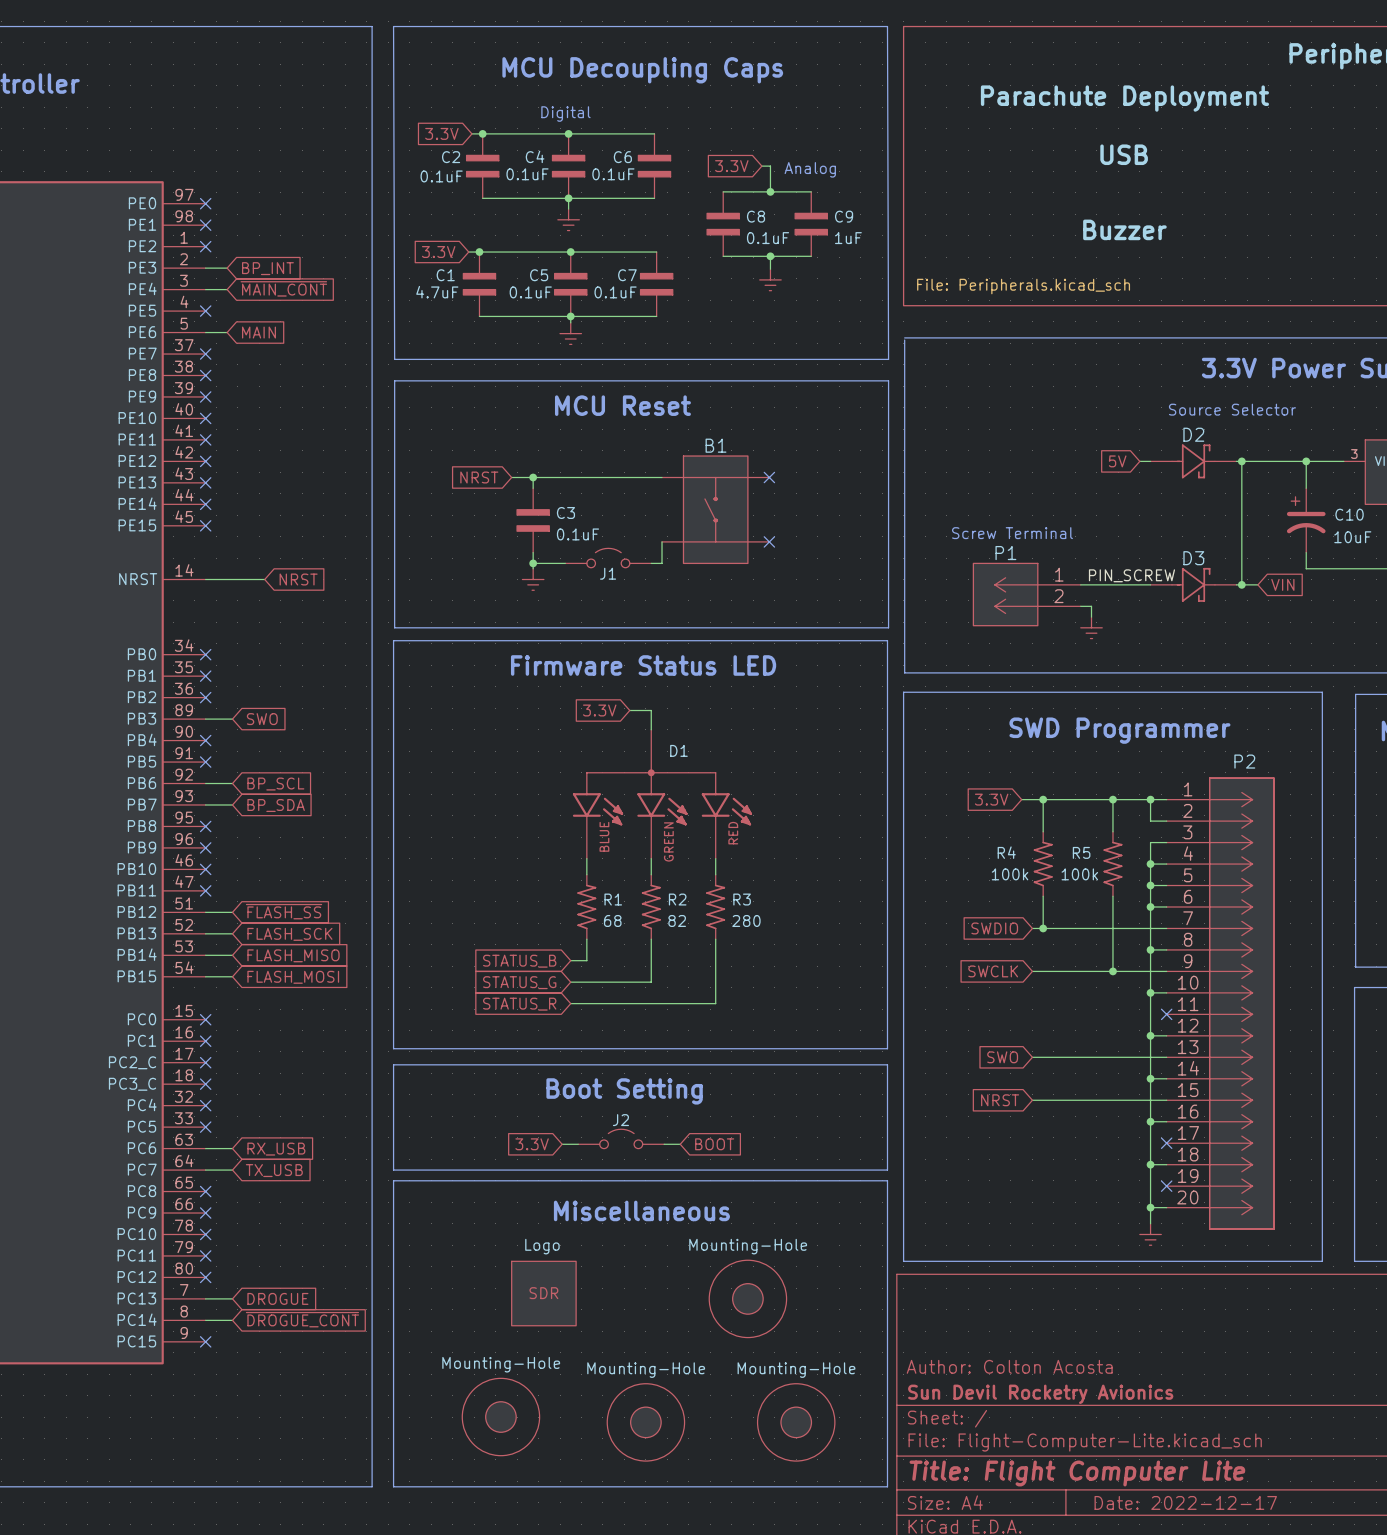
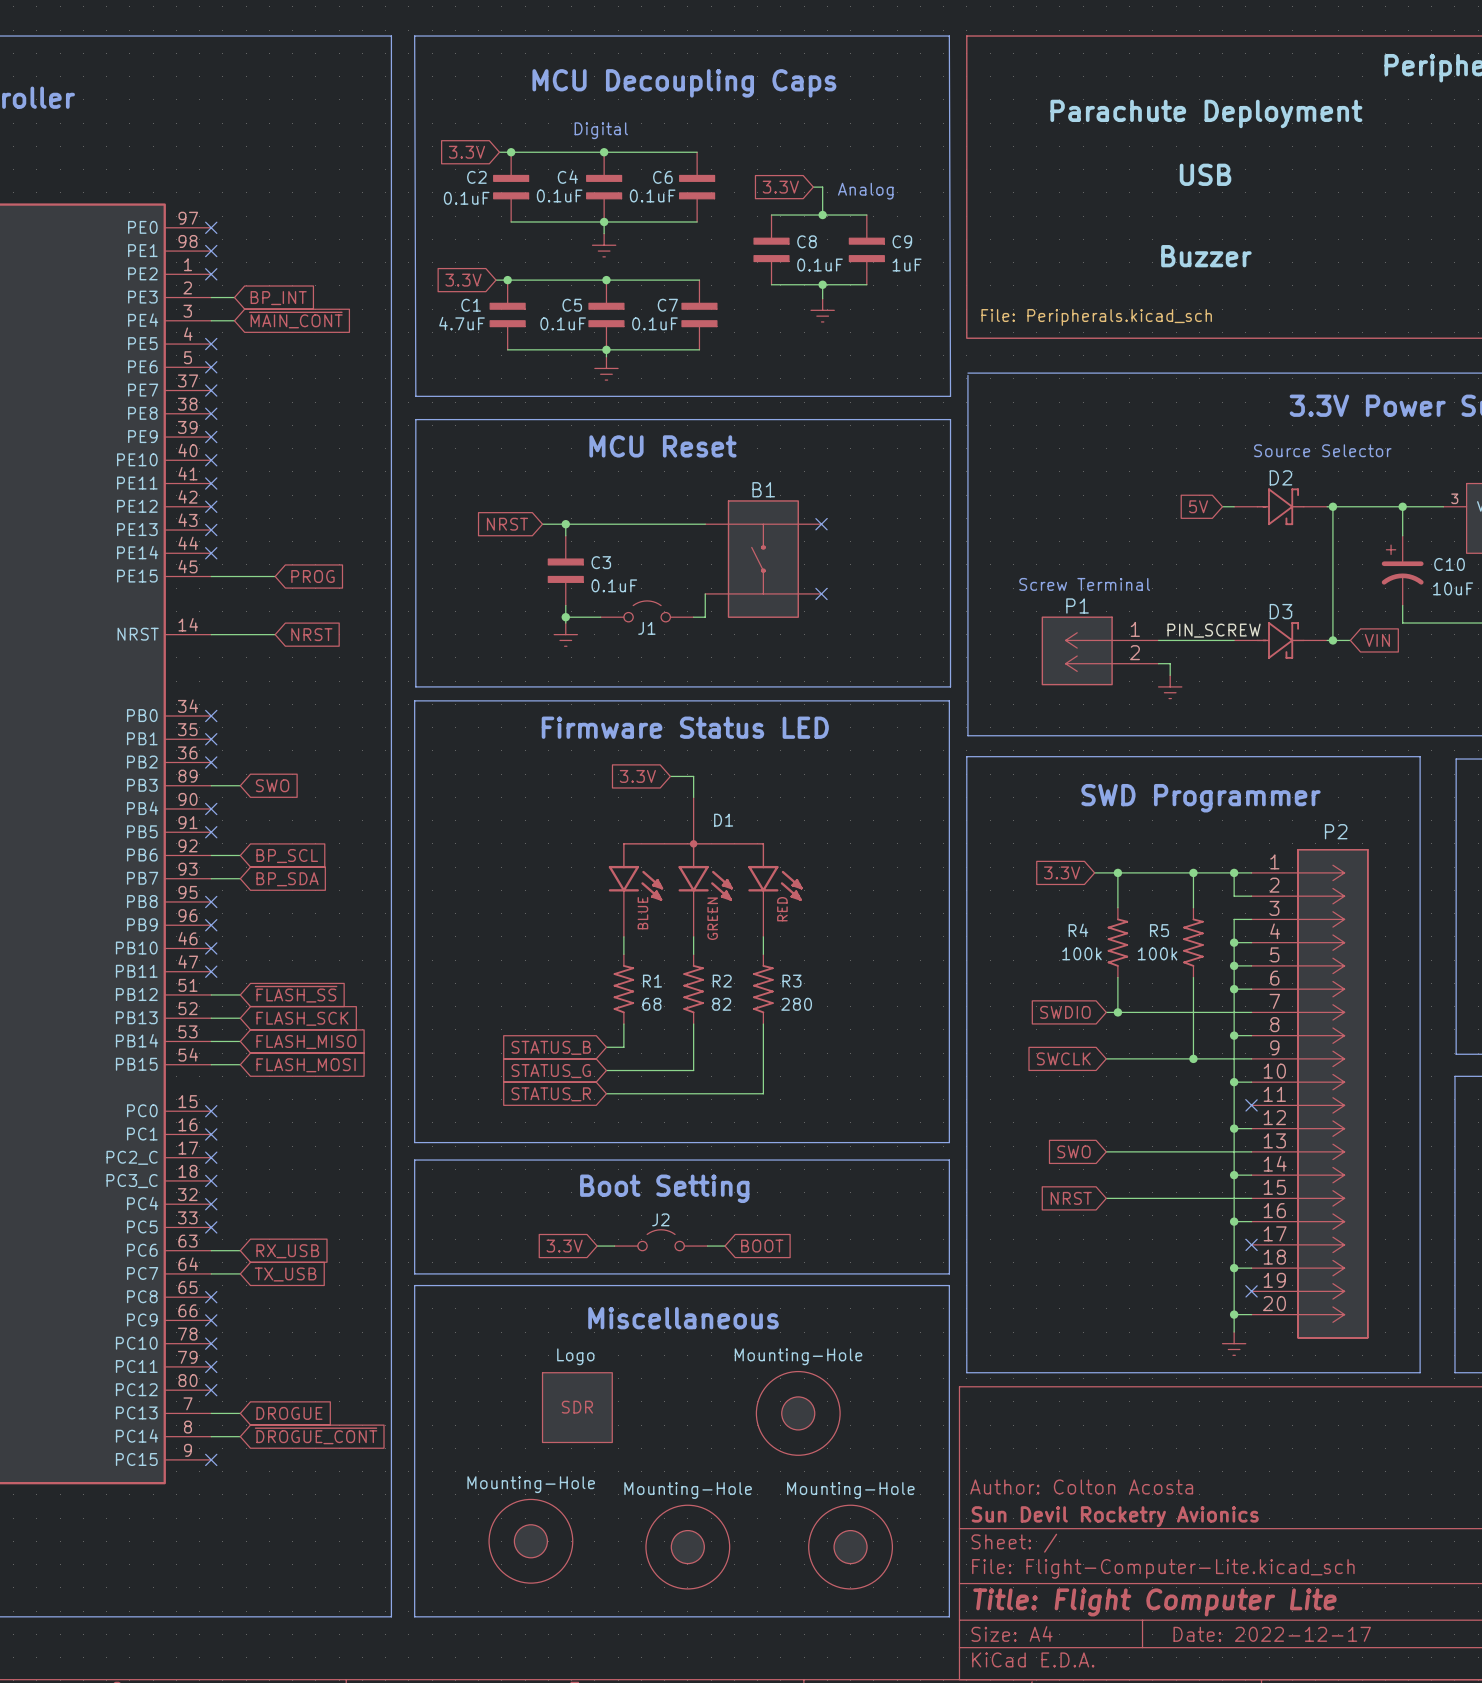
wire: (205, 332) (227, 332) -> none
no-connect mark: none -> (211, 367)
global label: MAIN (258, 332) -> none
wire: none -> (211, 576) (275, 576)
no-connect mark: (205, 525) -> none
global label: none -> PROG (312, 576)

